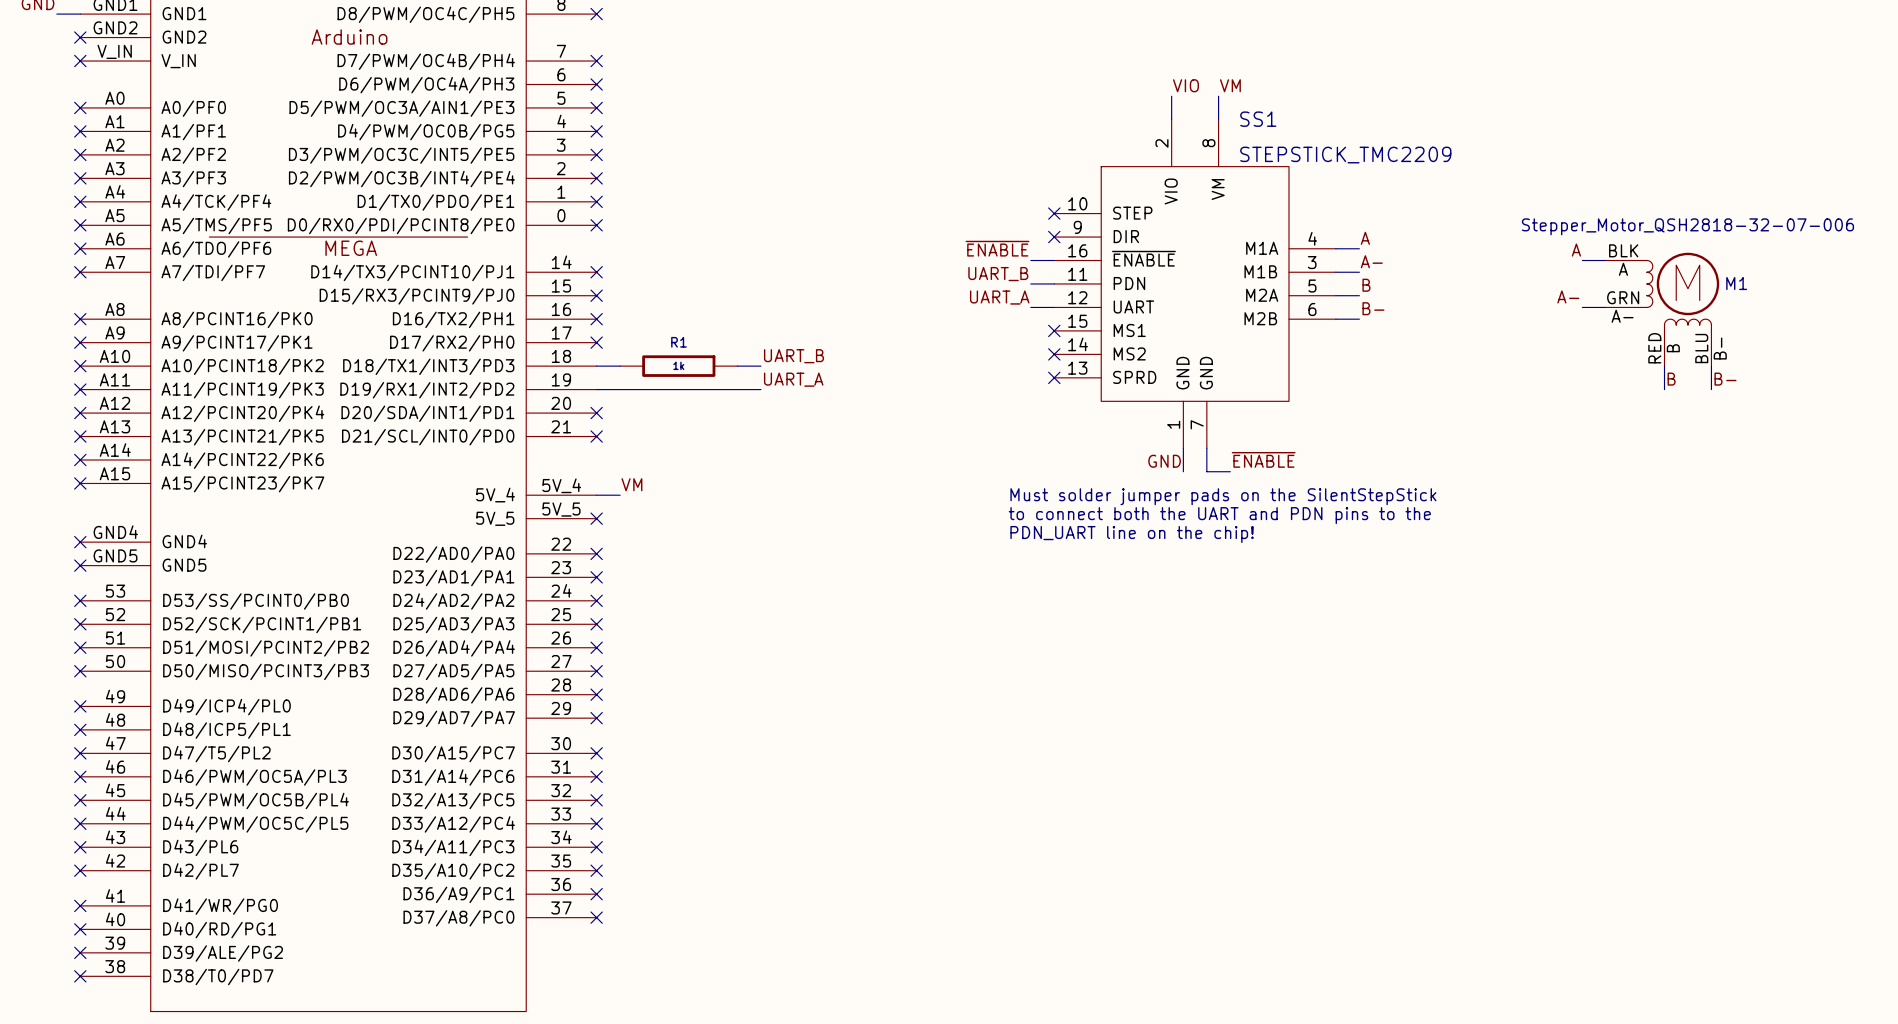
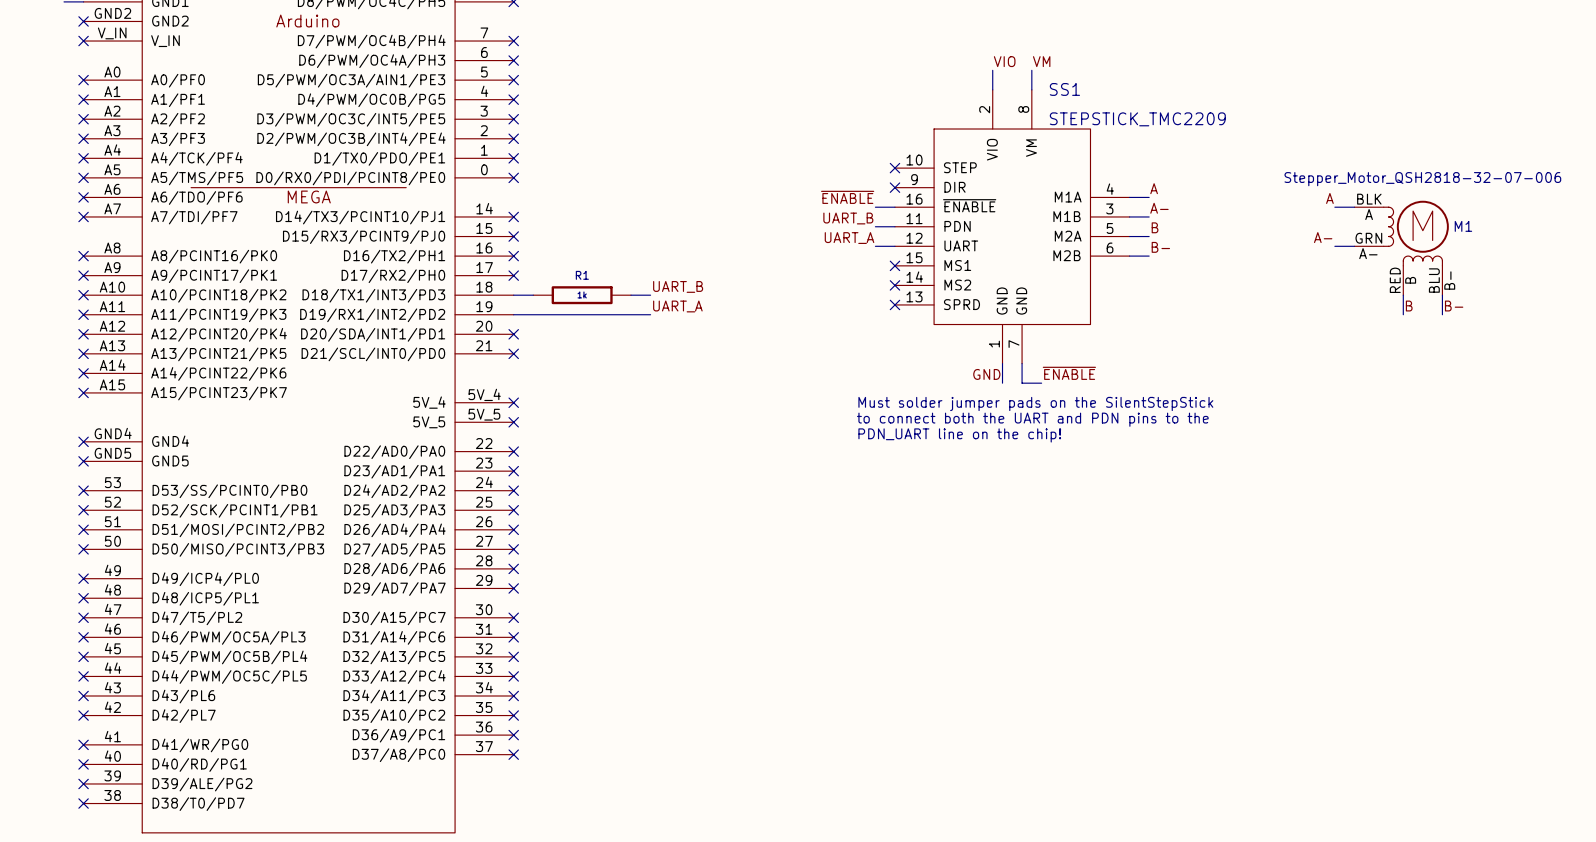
label: VM (631, 484) -> none
wire: (596, 495) (620, 495) -> none
no-connect mark: none -> (513, 402)

